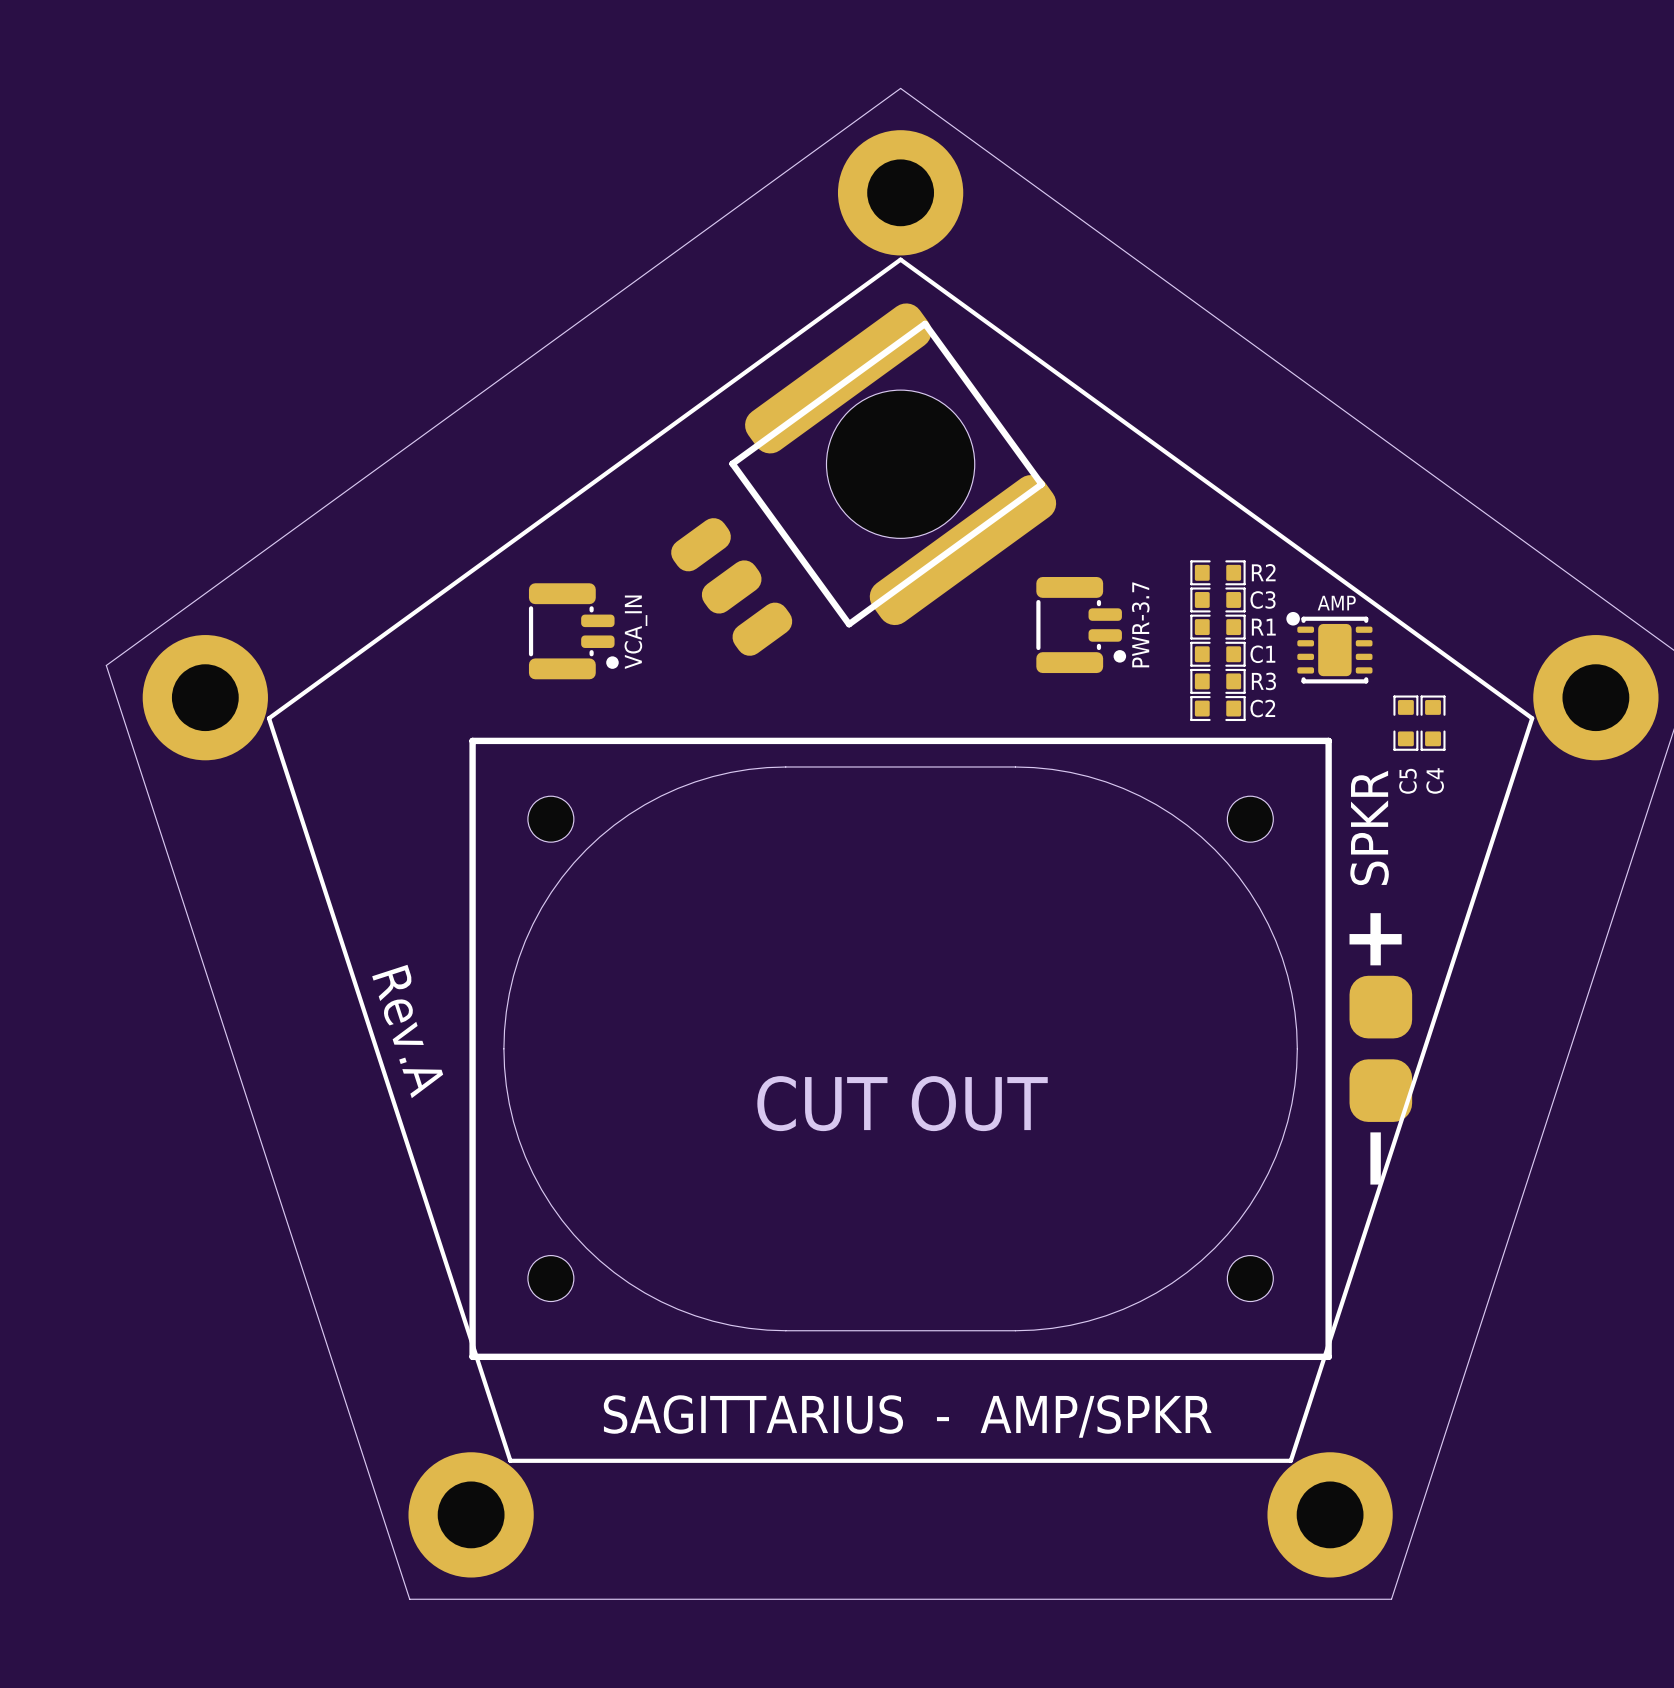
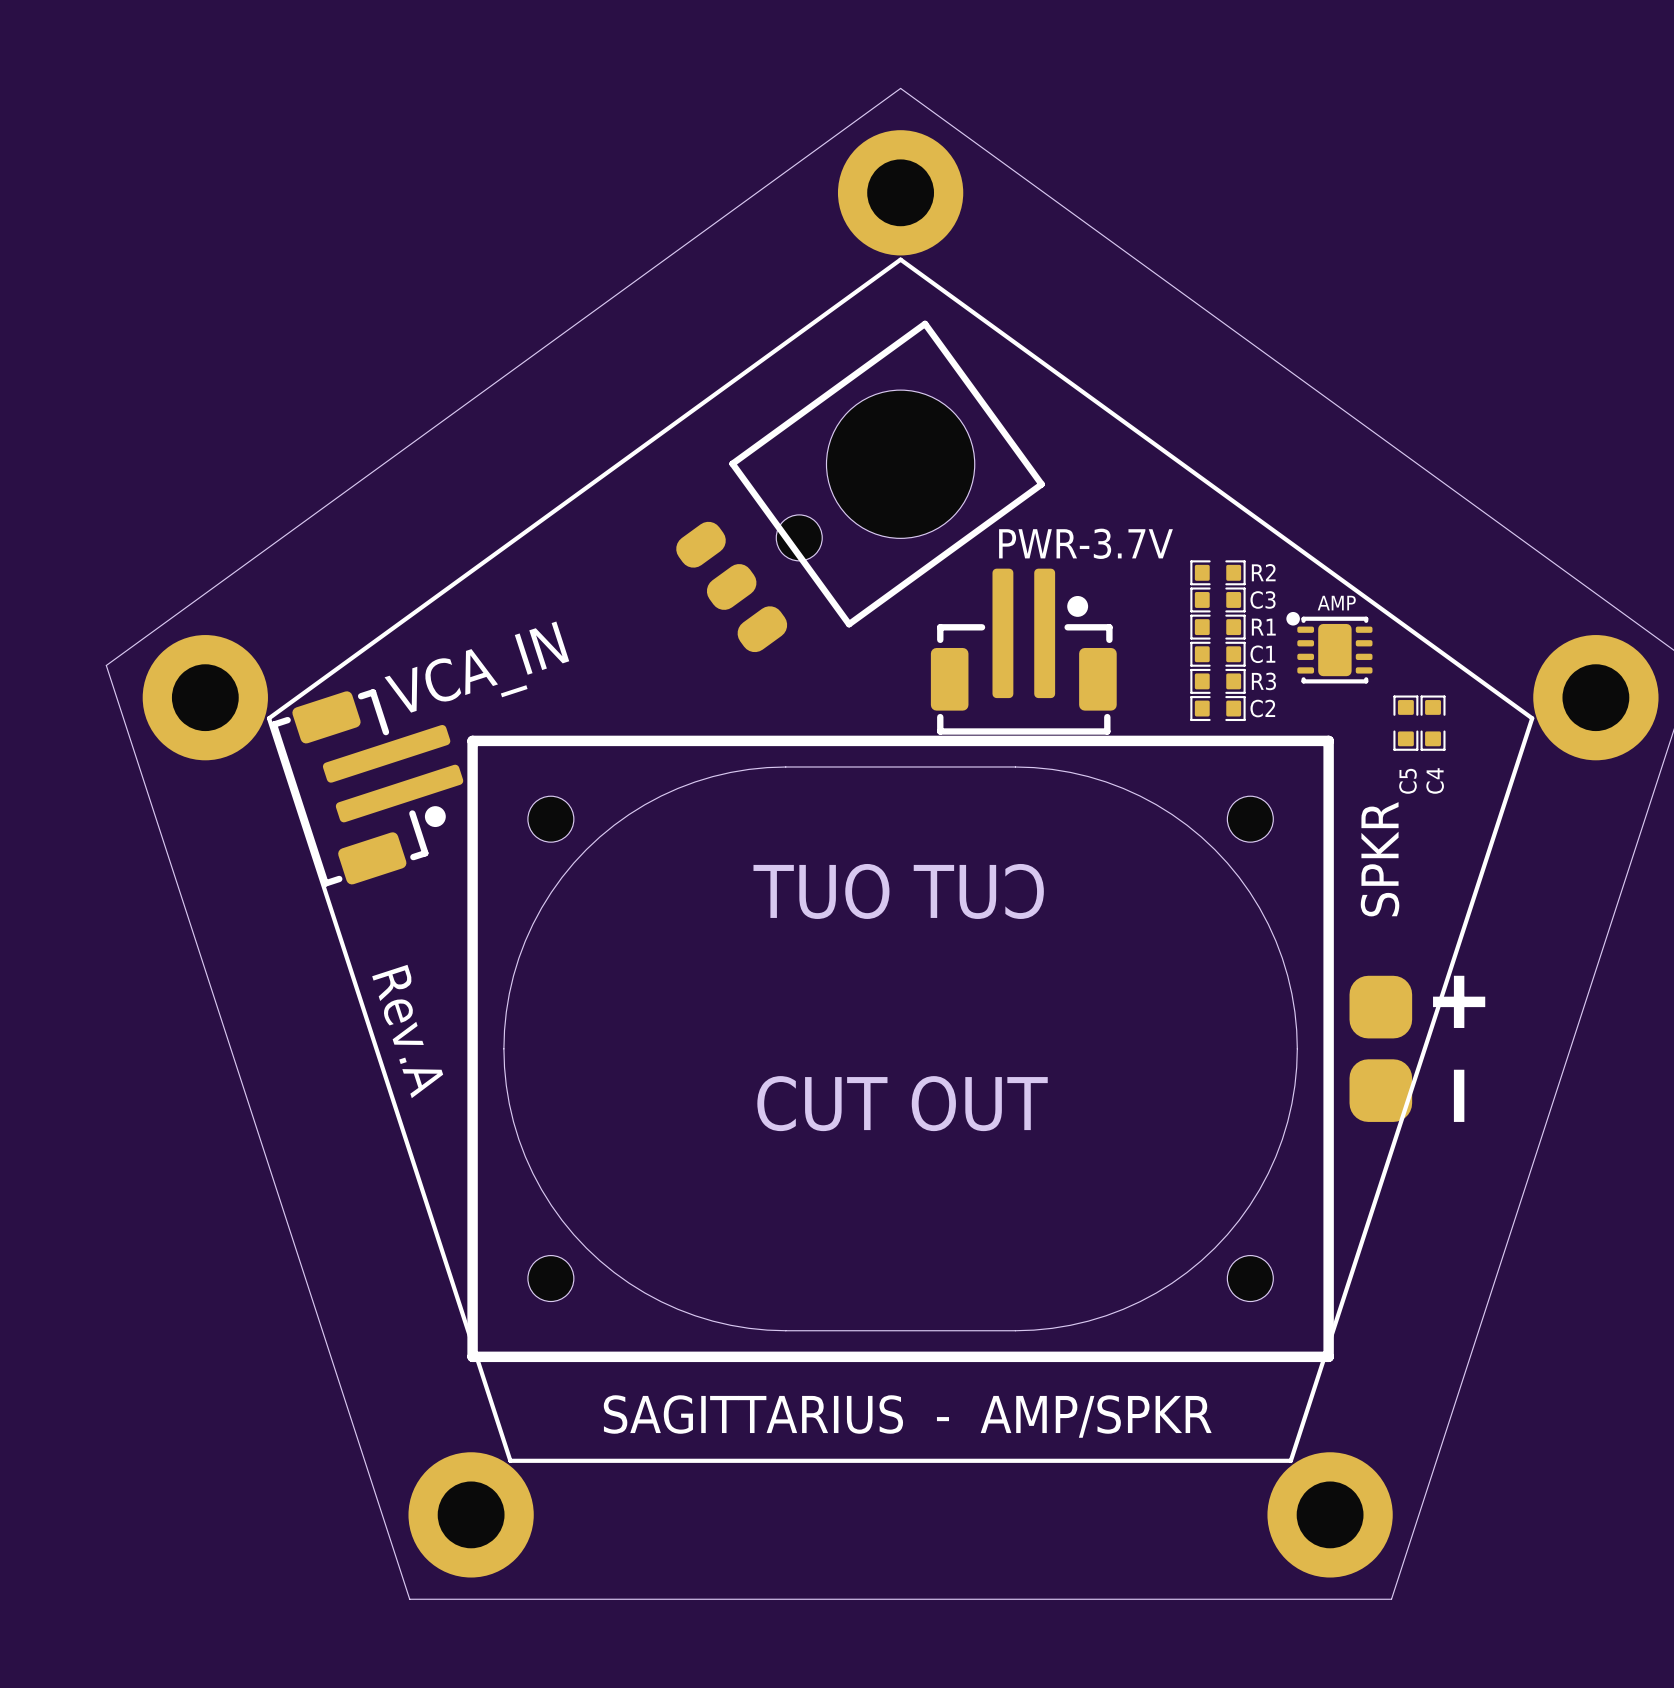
part footprint: [671, 303, 1057, 656] -> [676, 320, 1045, 653]
PWR-3.7: (1081, 625) -> none
VCA_IN: (573, 631) -> none
PWR-3.7V: none -> (1023, 651)
VCA_IN: none -> (367, 787)
SPKR: (940, 1048) -> none
SPKR: none -> (976, 1048)

